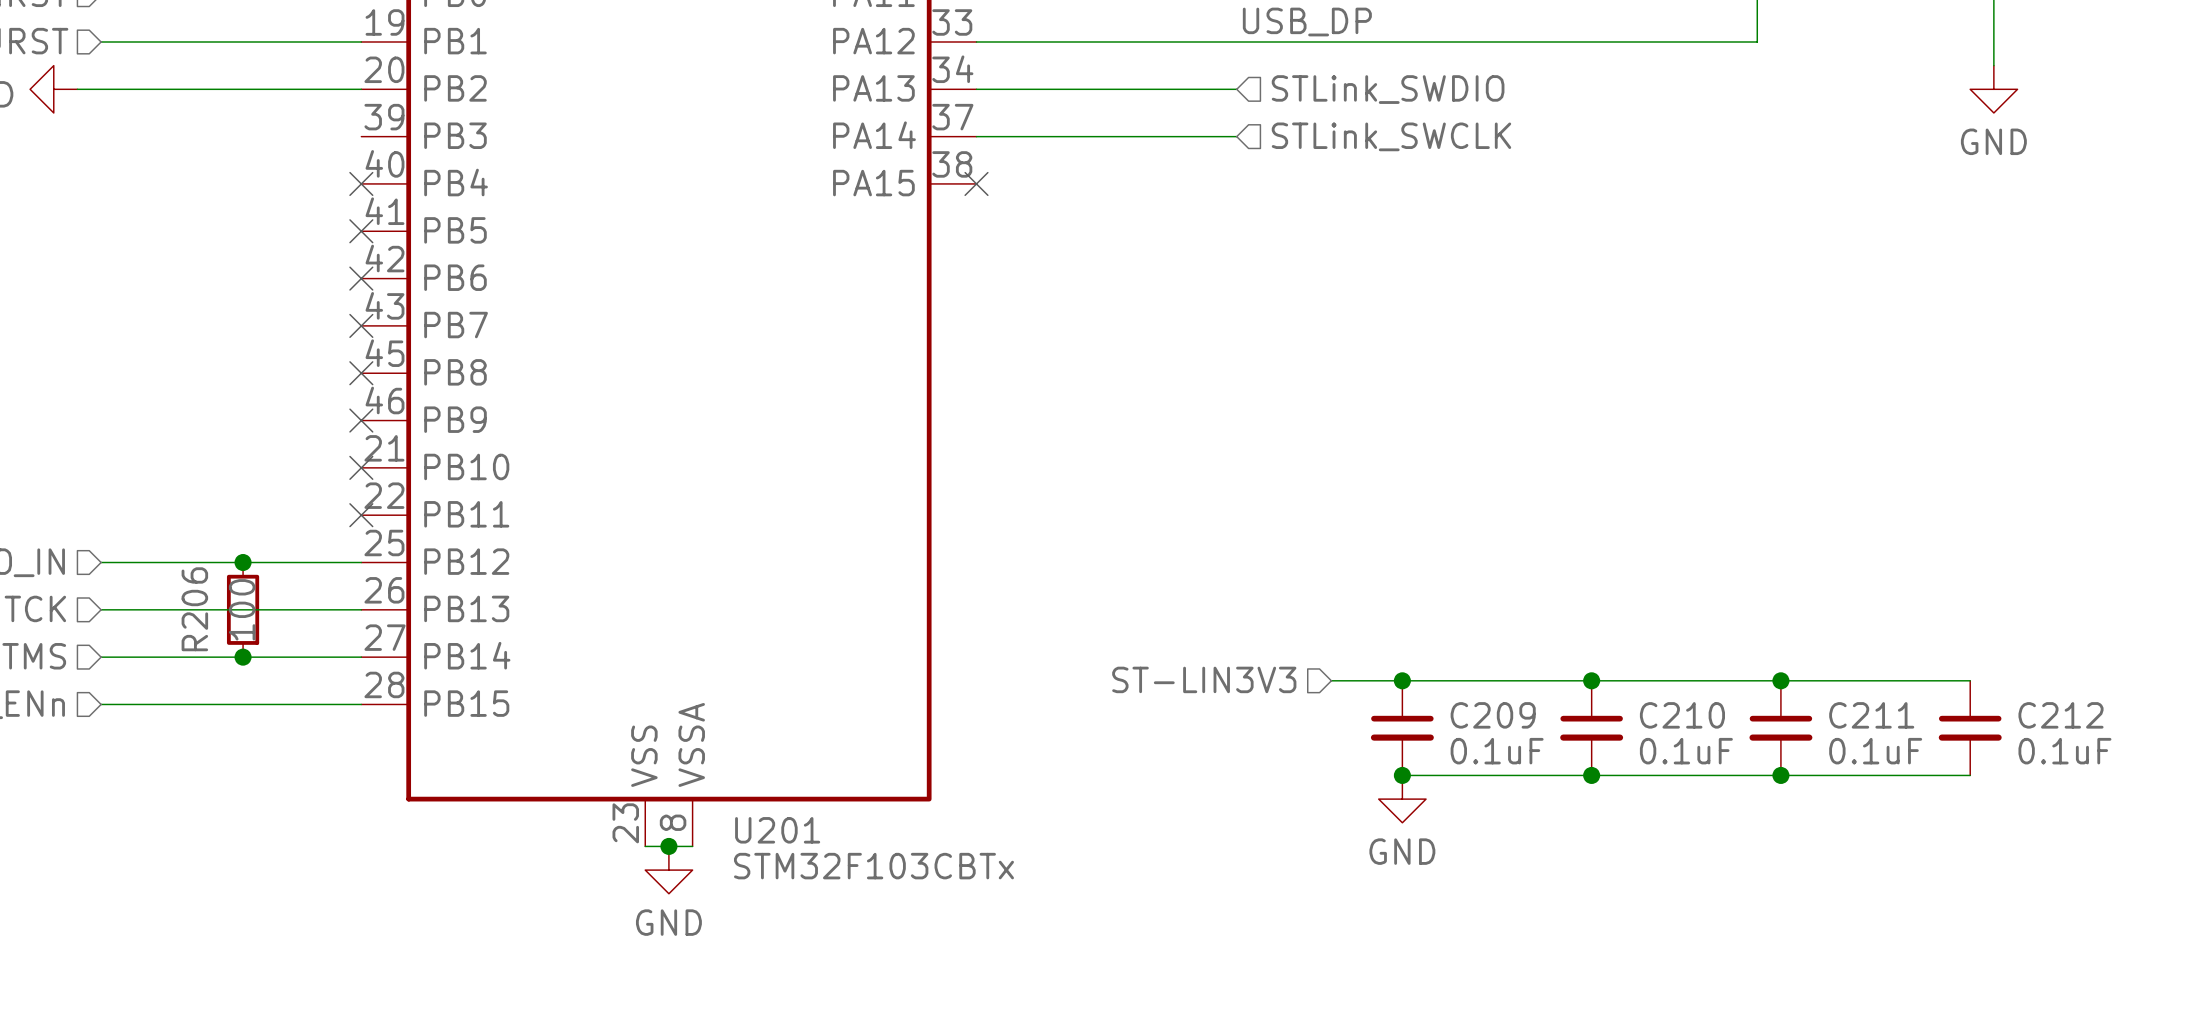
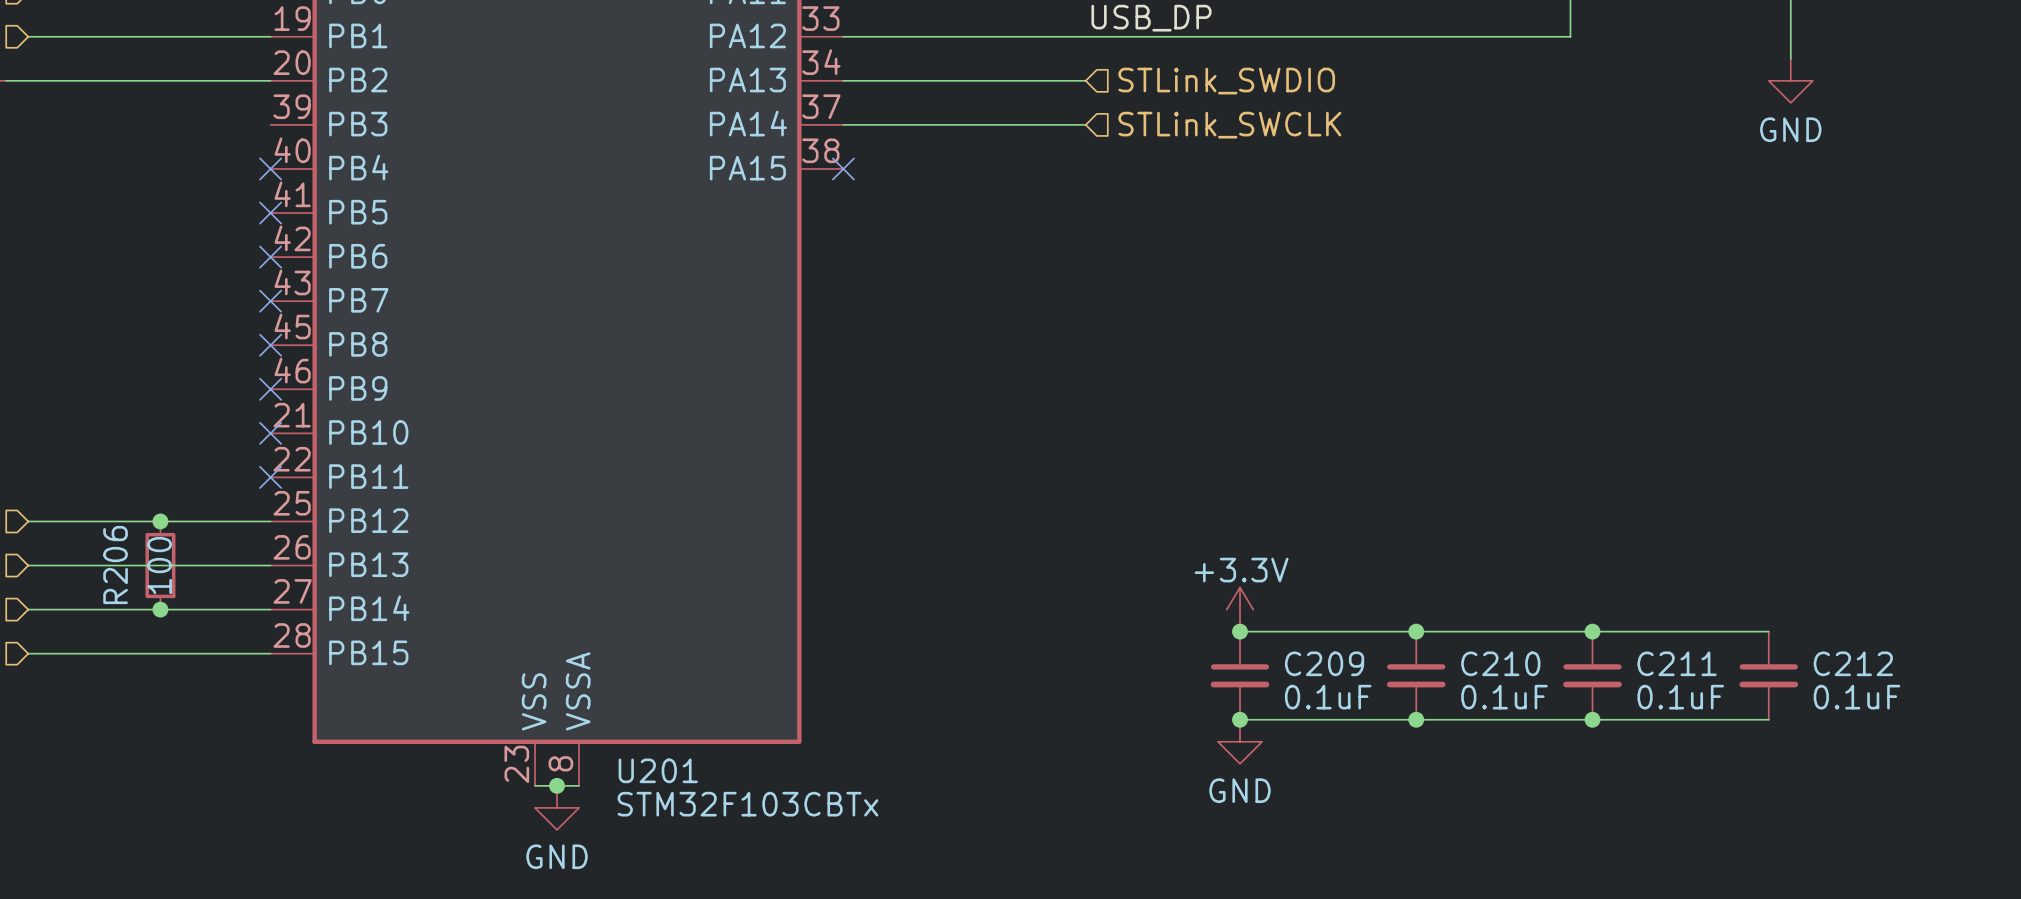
power symbol: none -> +3.3V (1240, 609)
hierarchical label: ST-LIN3V3 (1204, 679) -> none
wire: (1331, 680) (1402, 680) -> none

